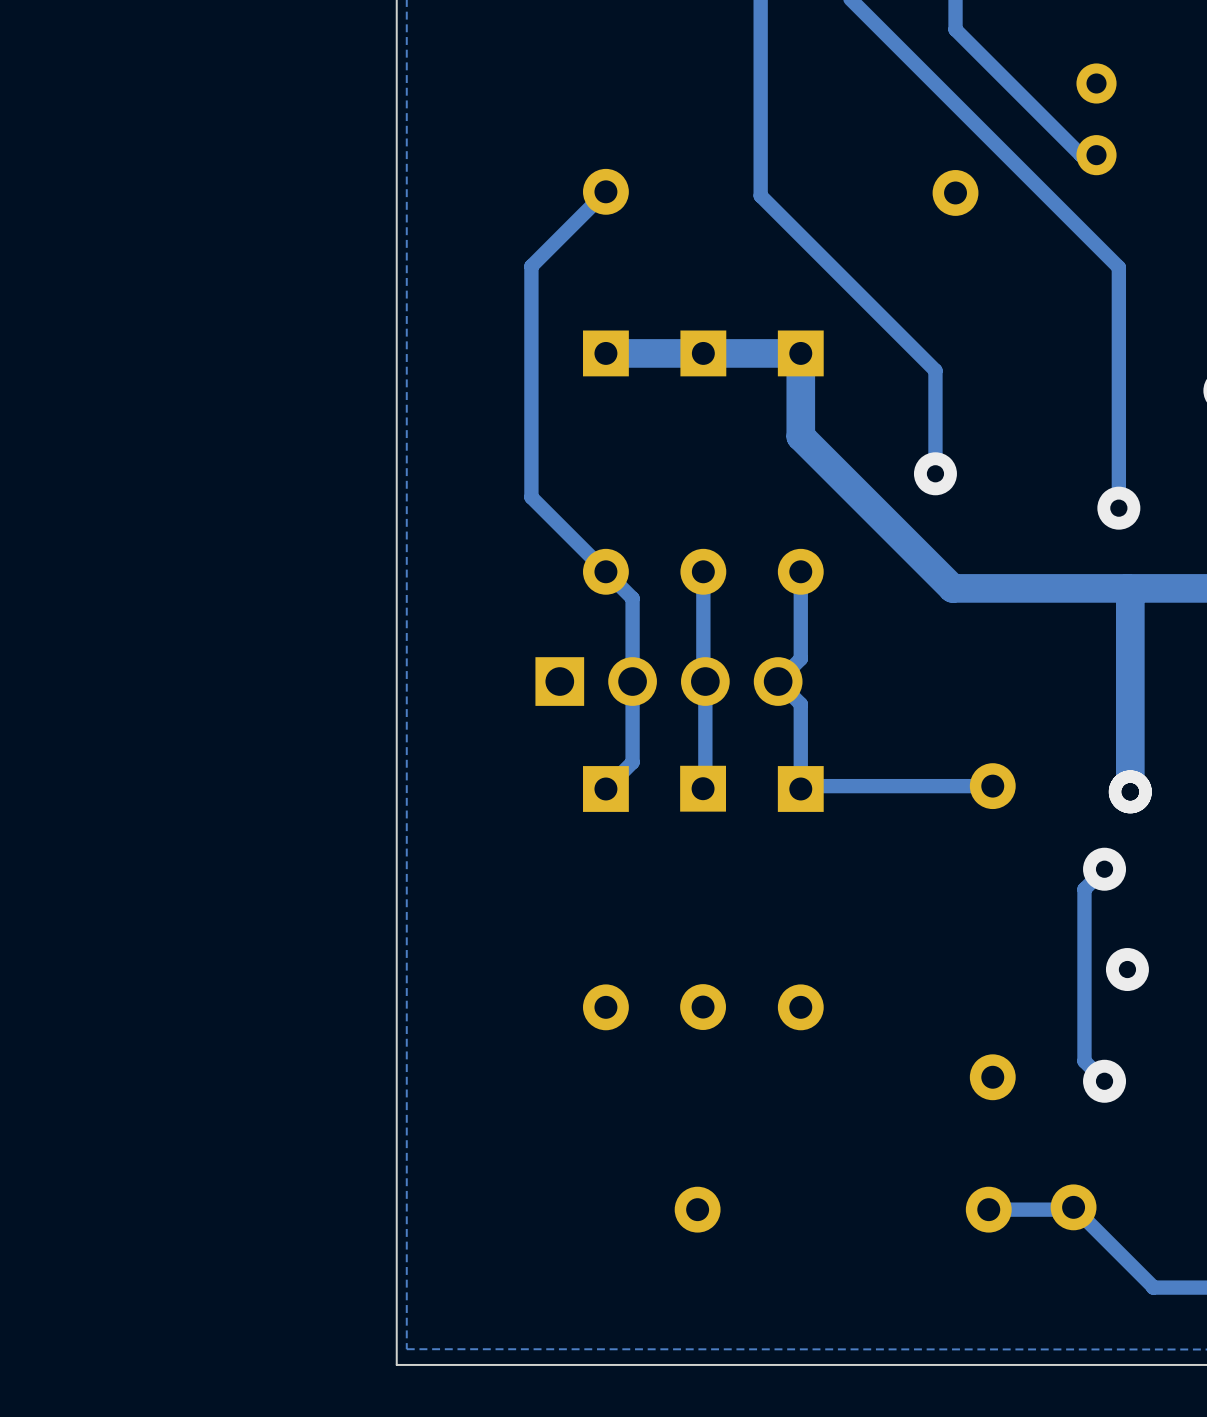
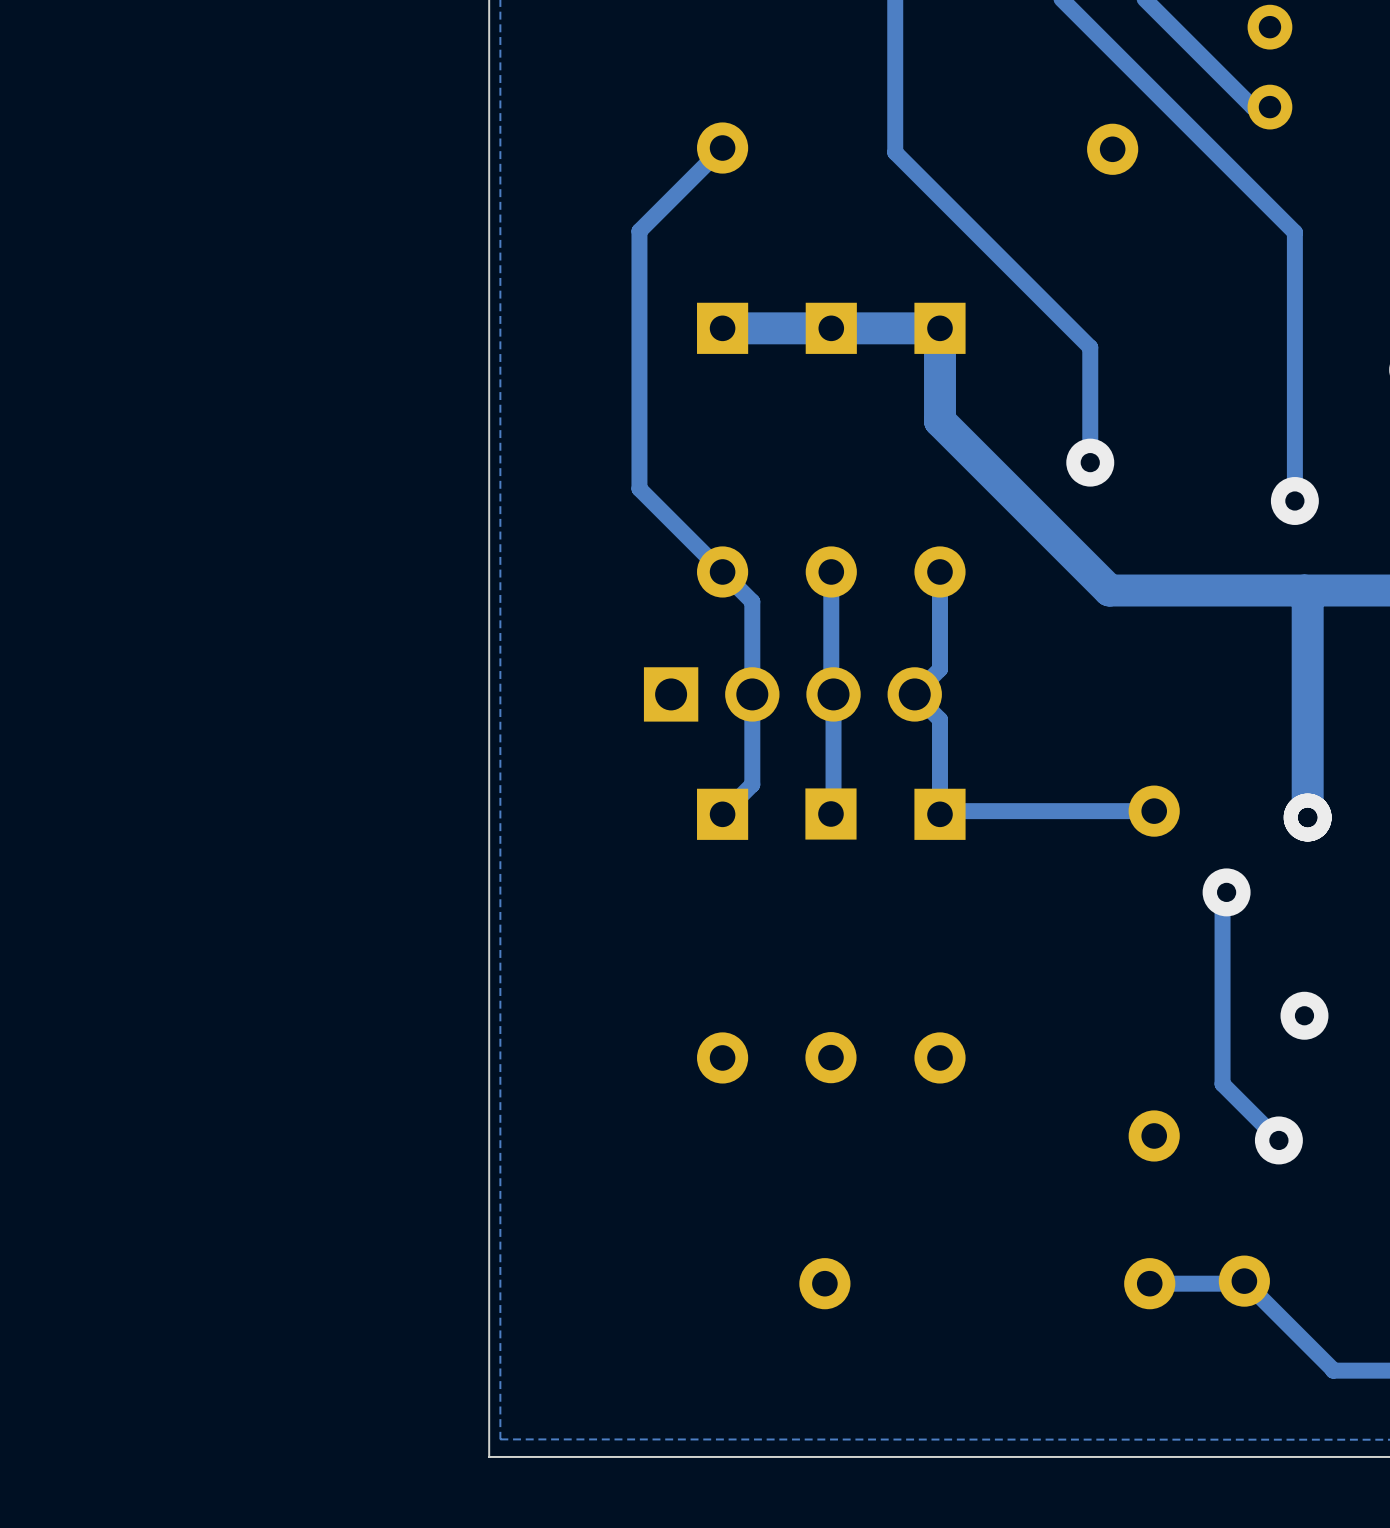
track: (1104, 869) (1084, 889) (1084, 1061) -> (1226, 892) (1222, 896) (1222, 1084) (1256, 1118)
via position: (1104, 869) -> (1226, 892)

